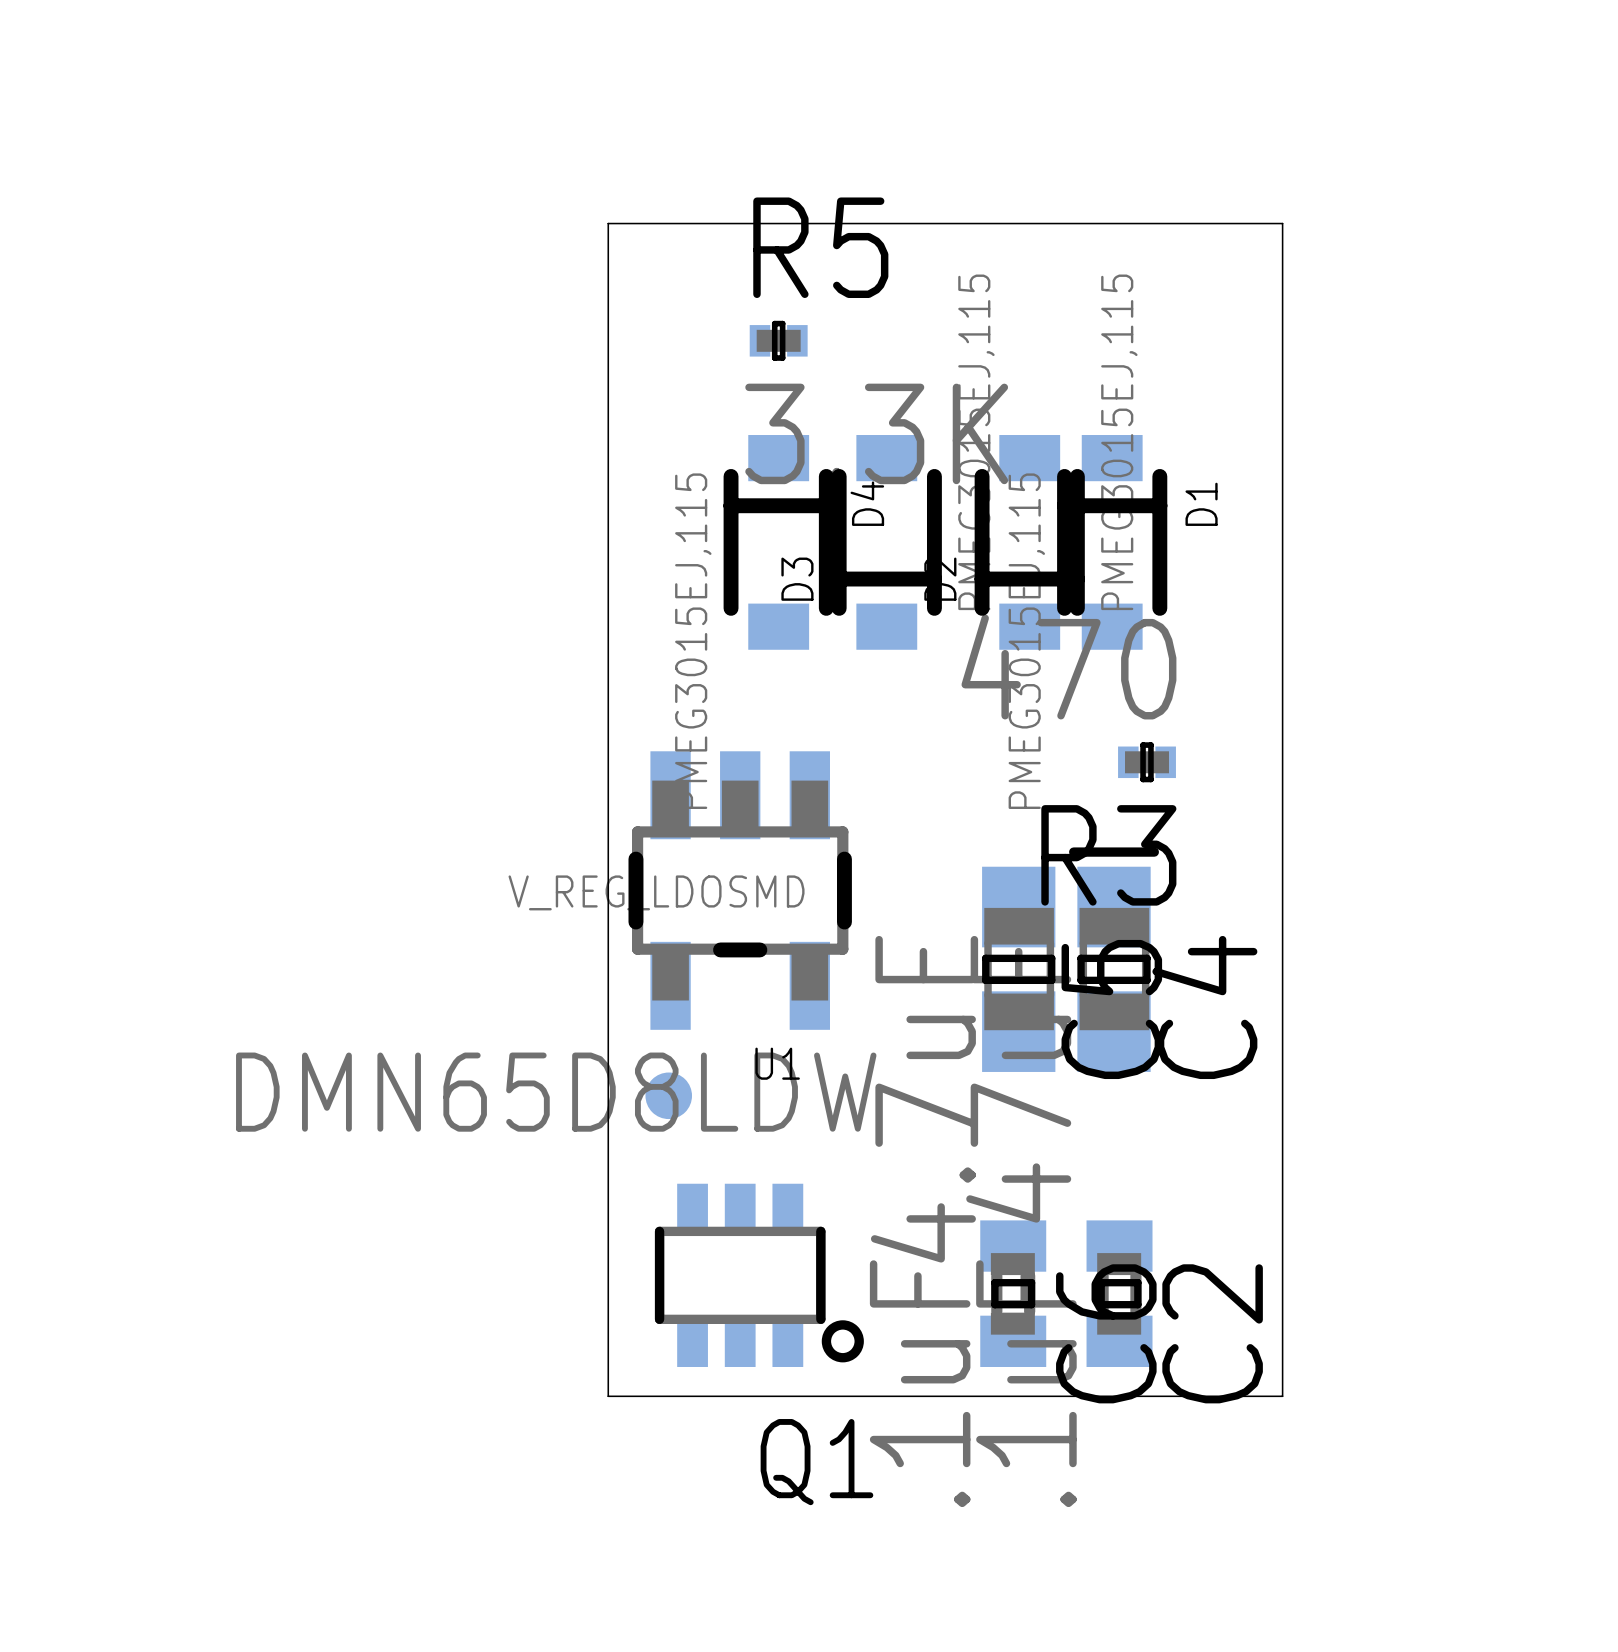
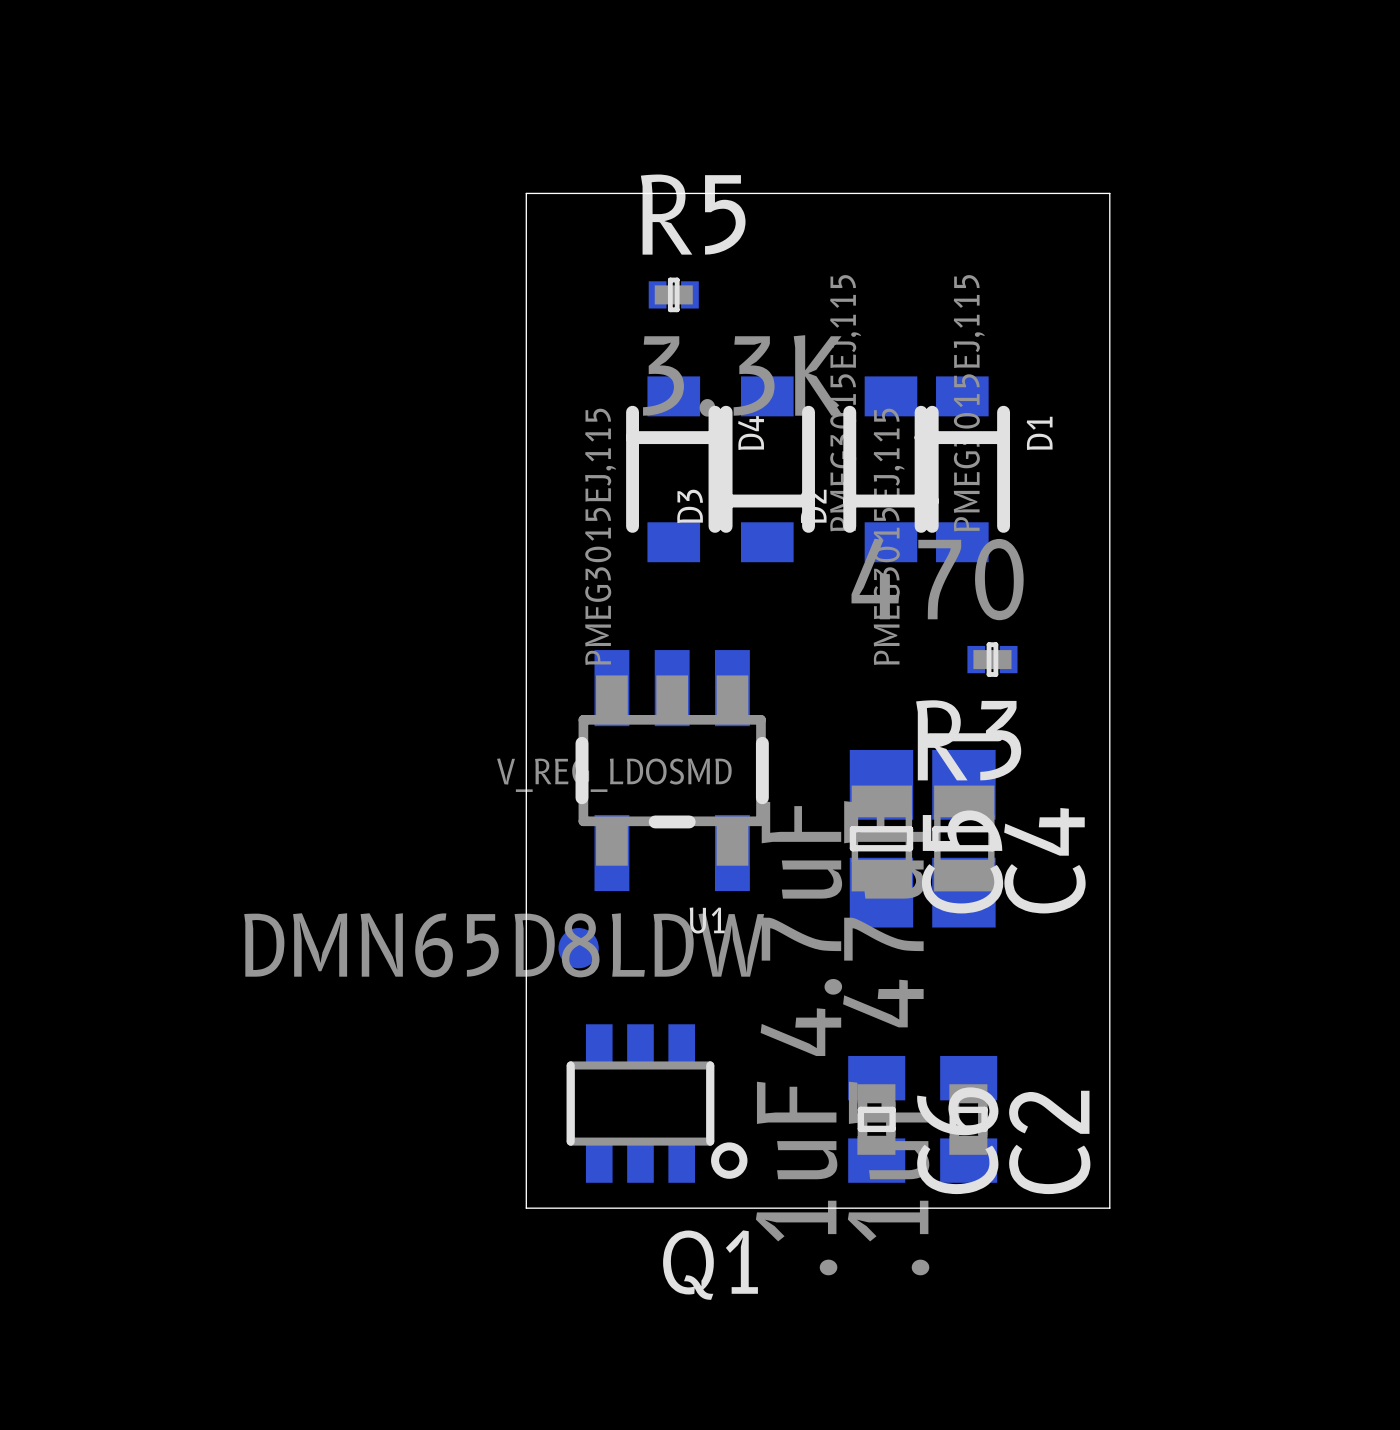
U1 position: (740, 890) -> (672, 770)

